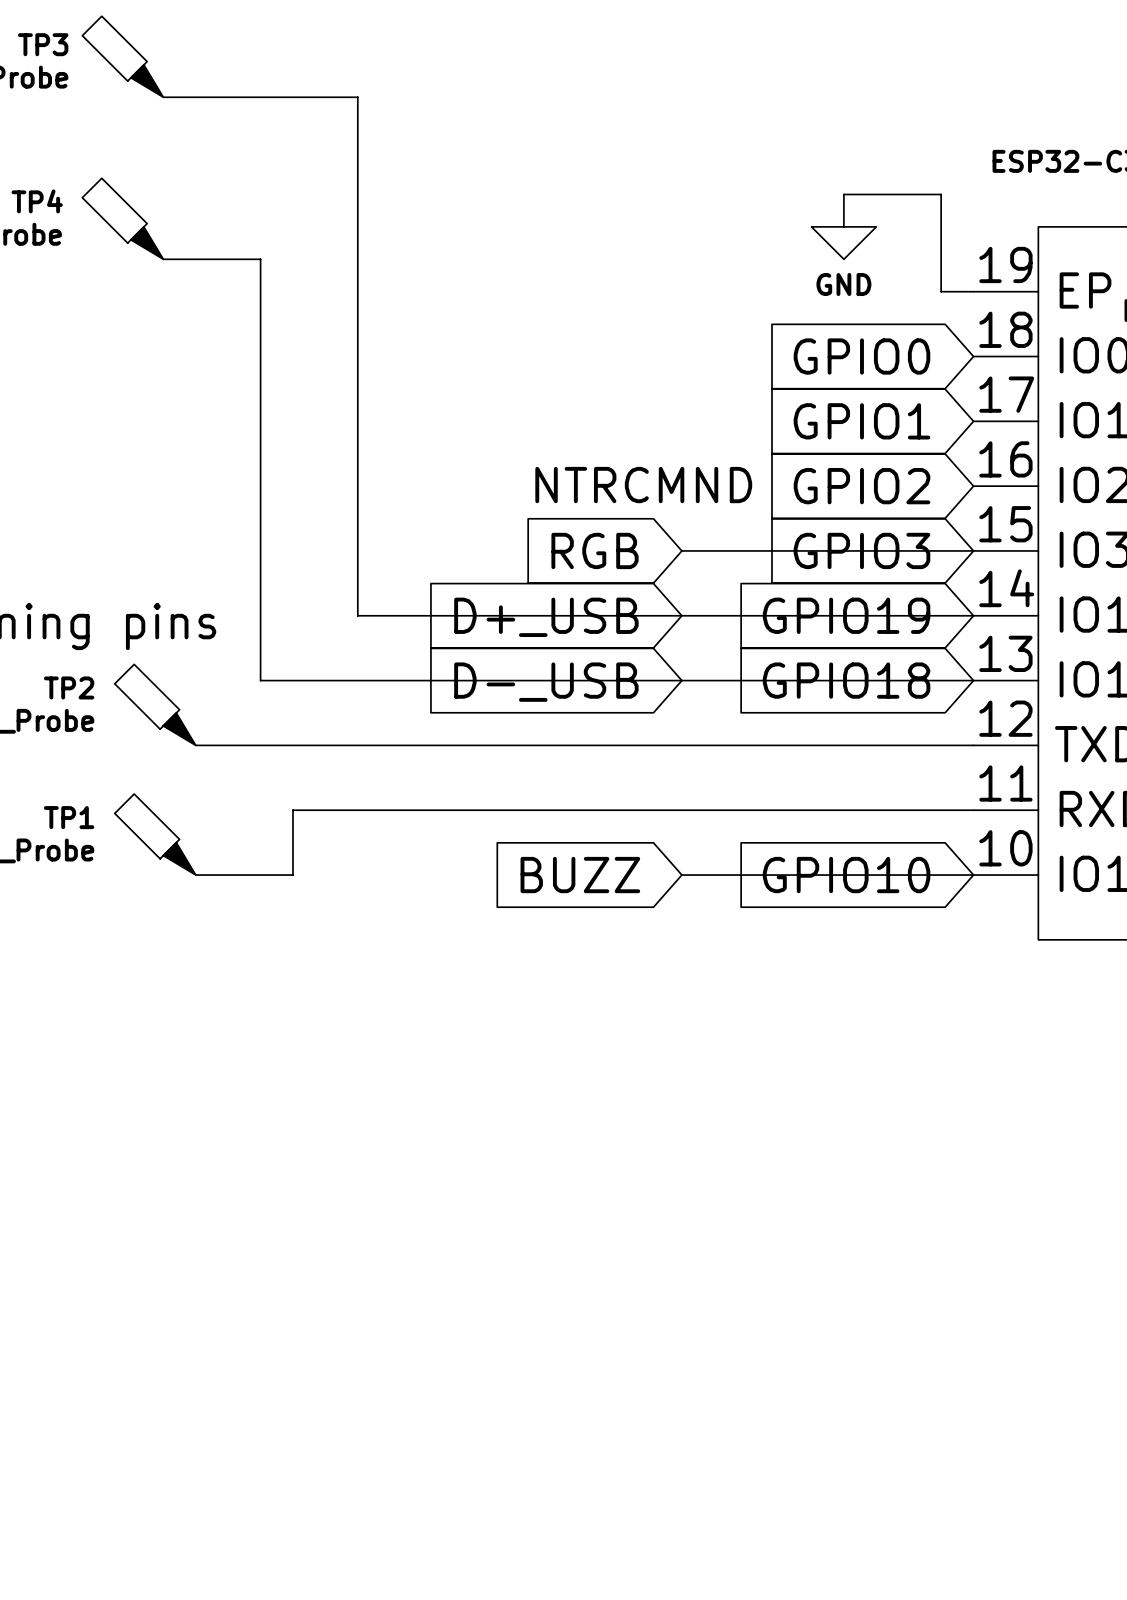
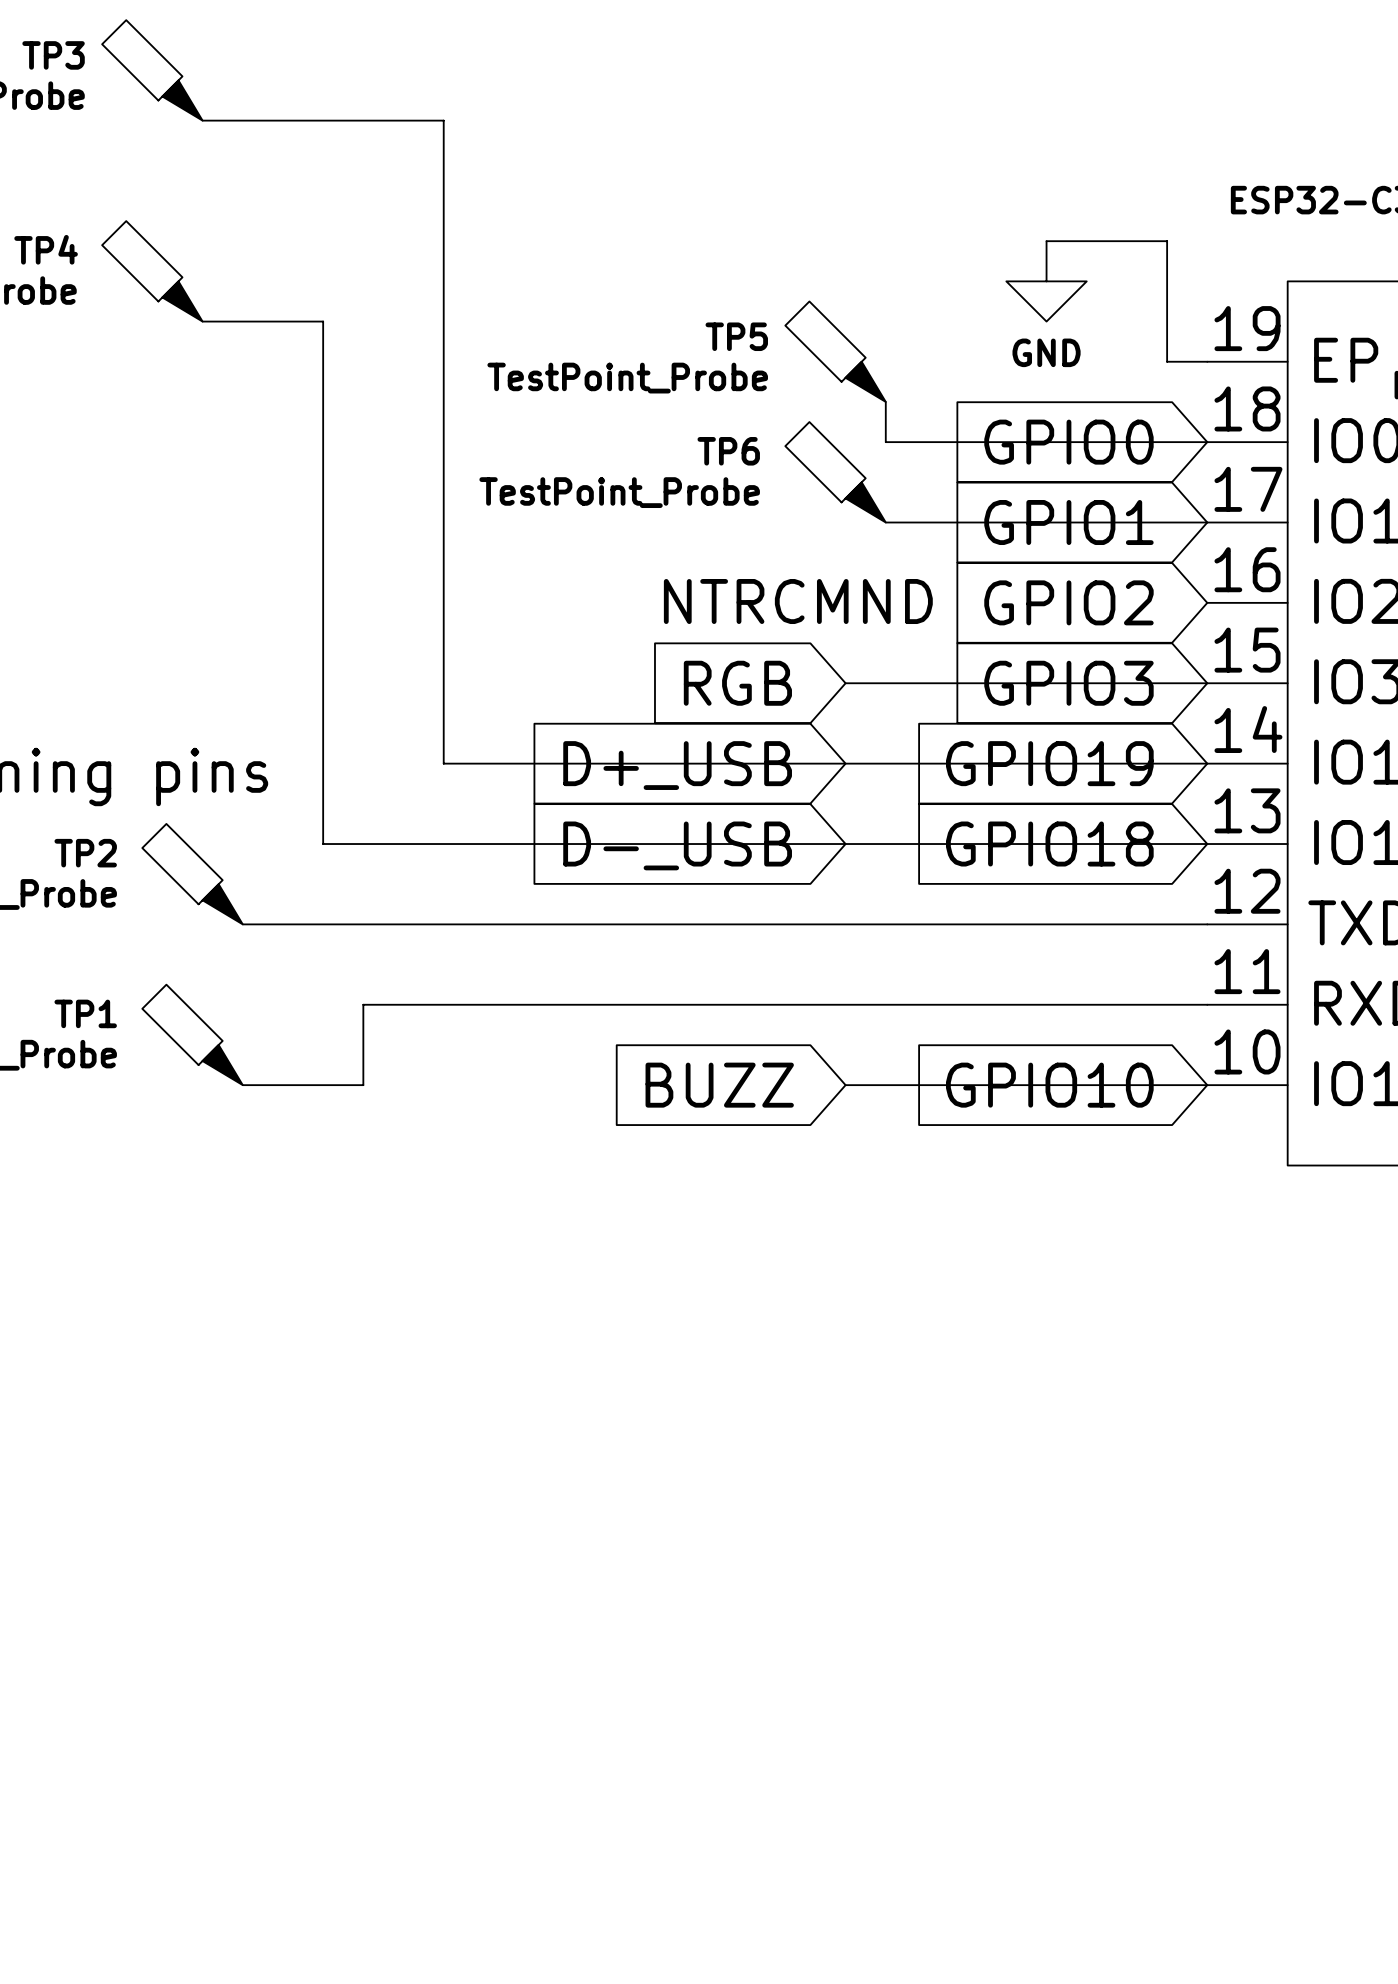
TP5: none -> TestPoint_Probe (835, 351)
wire: none -> (885, 401) (885, 442) (1207, 442)
TP6: none -> TestPoint_Probe (835, 472)
wire: none -> (885, 522) (1207, 522)

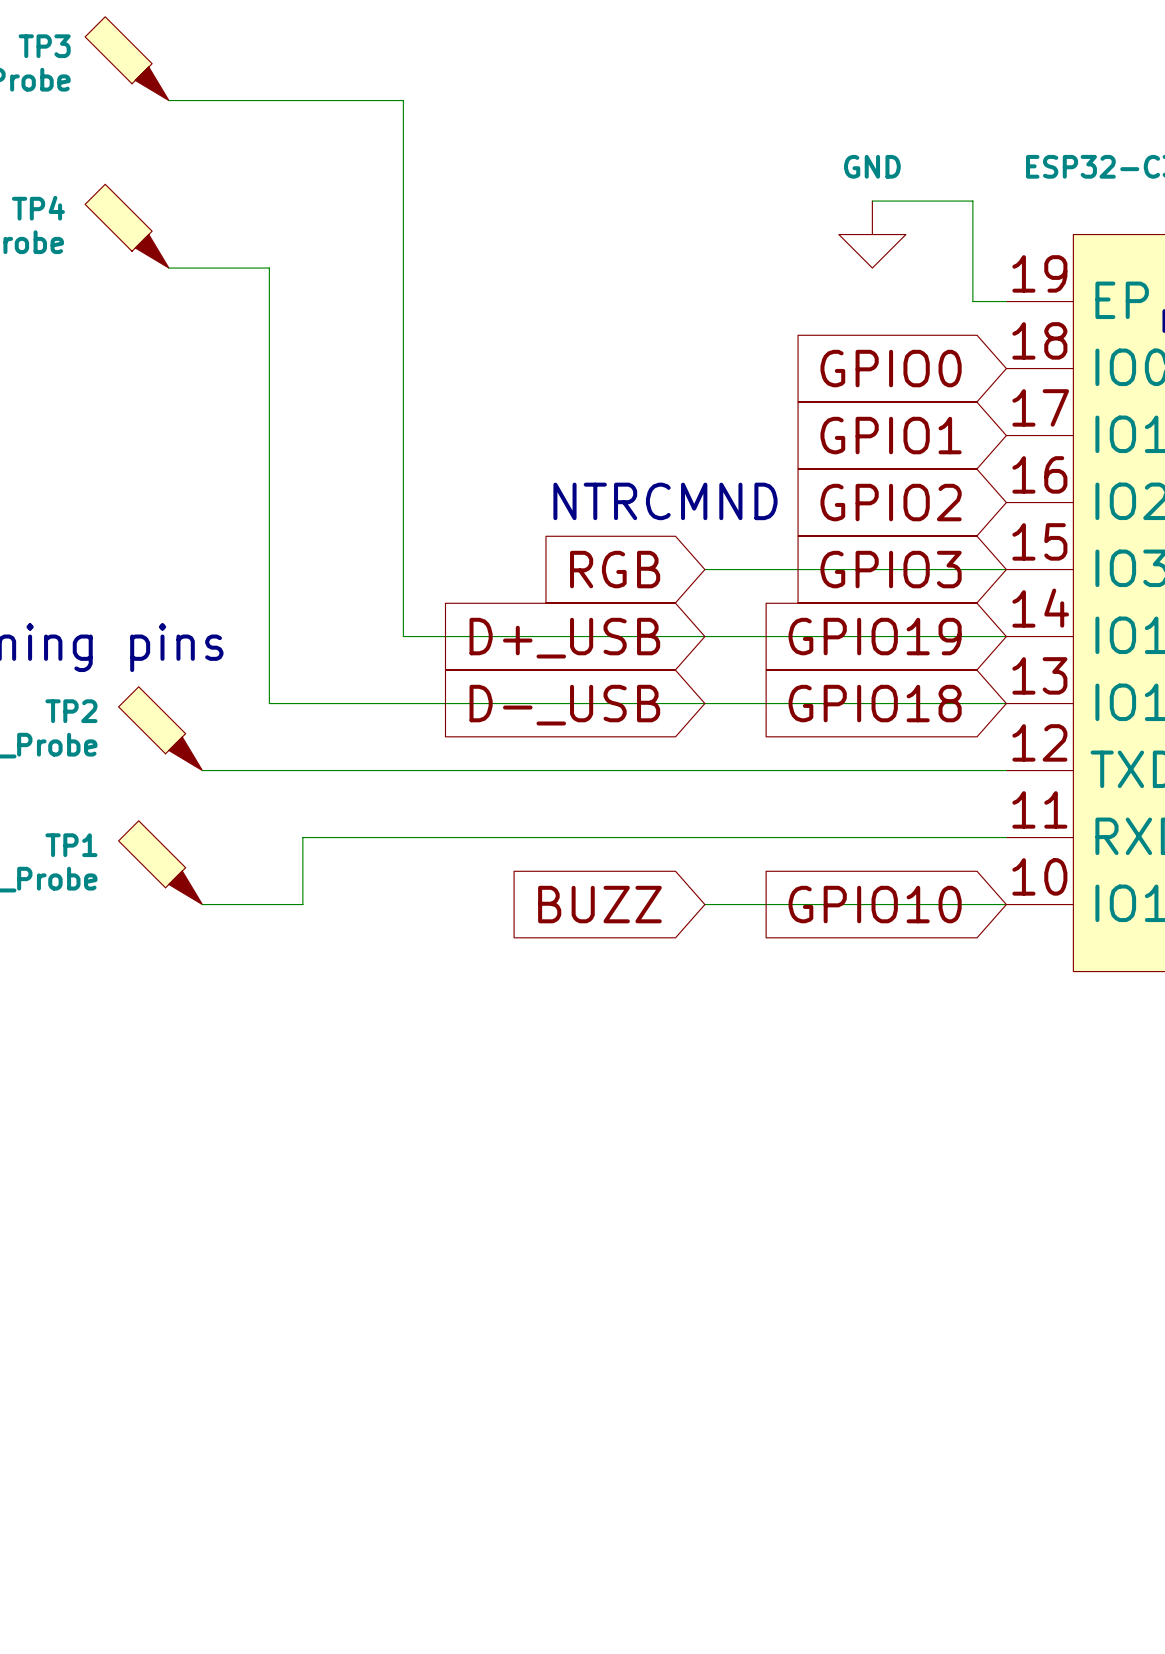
wire: (443, 120) (443, 763) (483, 763) -> (369, 100) (403, 100) (403, 636)
TP5: TestPoint_Probe (835, 351) -> none
power symbol text position: GND (1046, 352) -> GND (872, 166)
wire: (885, 401) (885, 442) (1207, 442) -> none
TP6: TestPoint_Probe (835, 472) -> none
wire: (885, 522) (1207, 522) -> none

